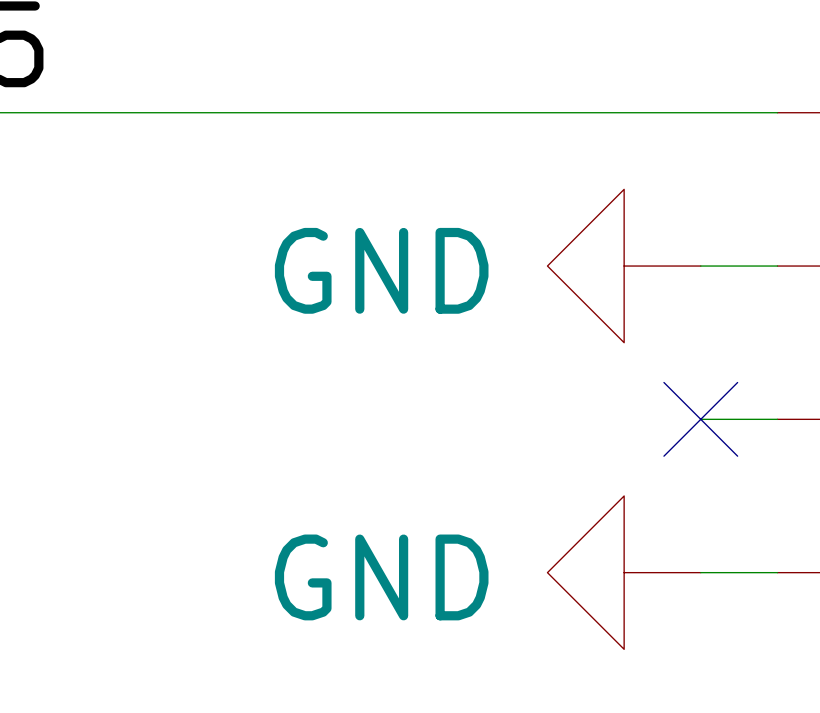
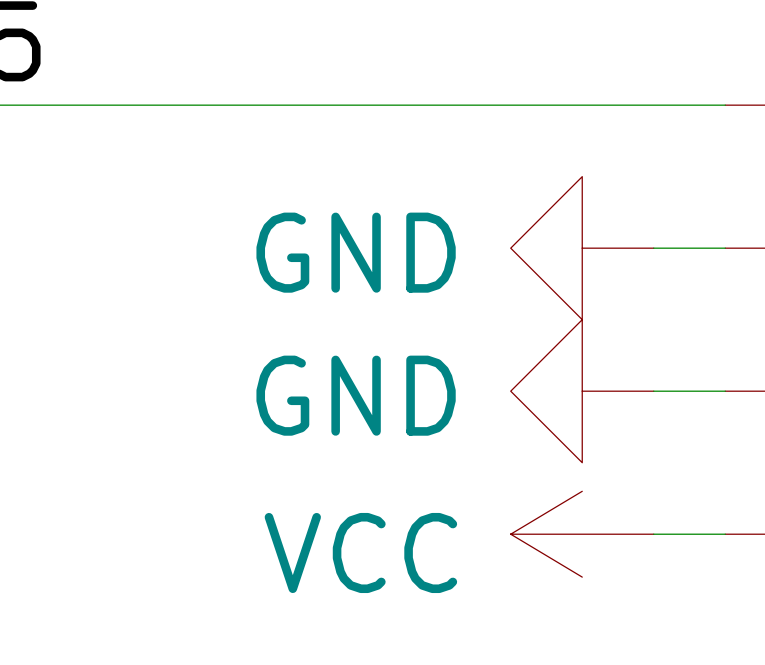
power symbol: none -> GND (582, 391)
no-connect mark: (700, 419) -> none
power symbol: GND (624, 572) -> VCC (582, 534)

